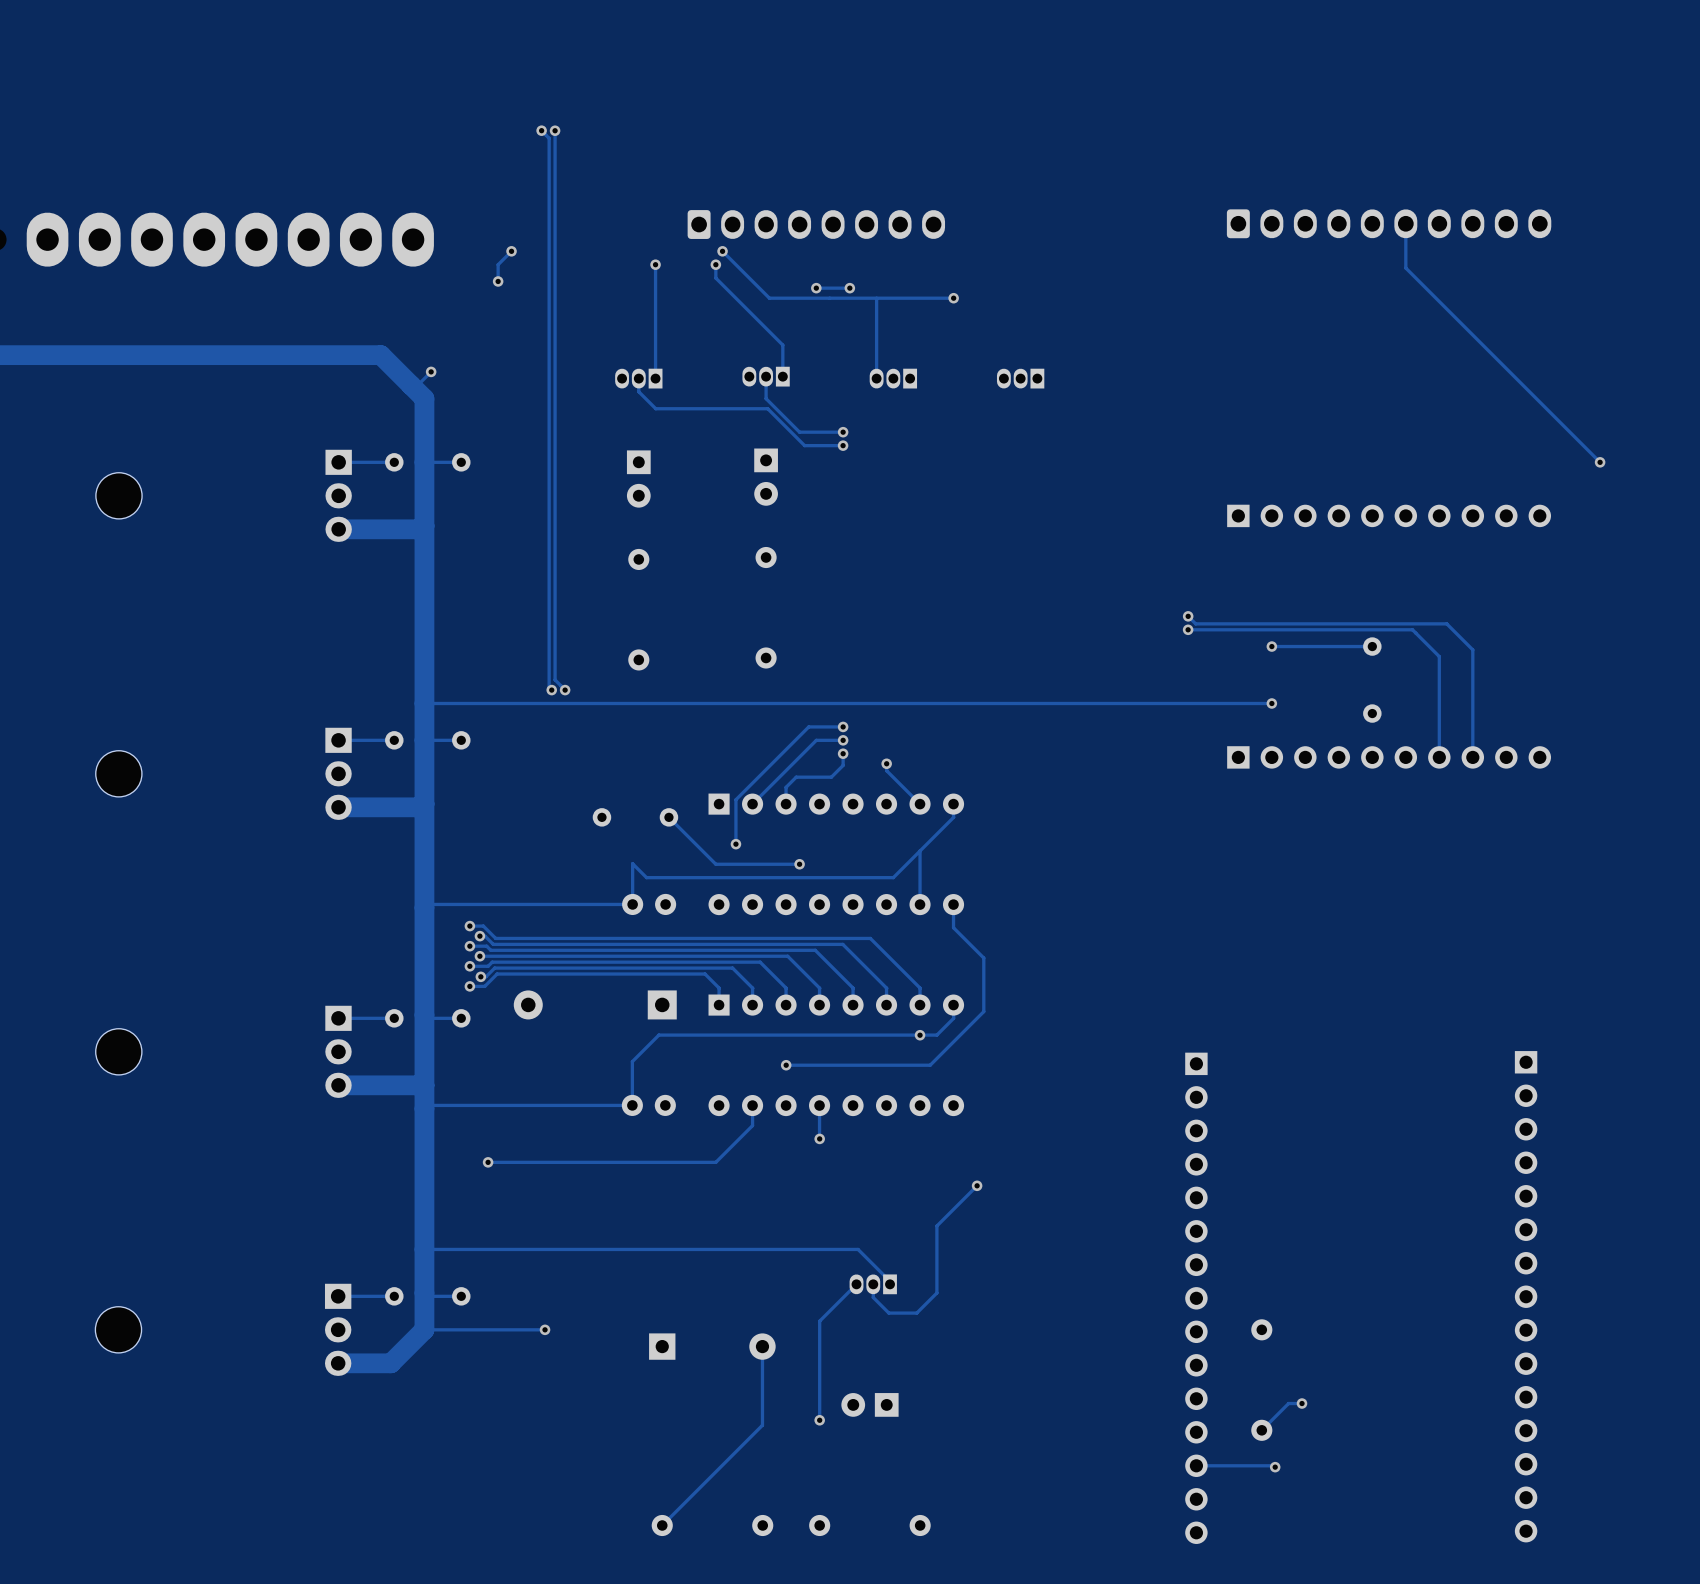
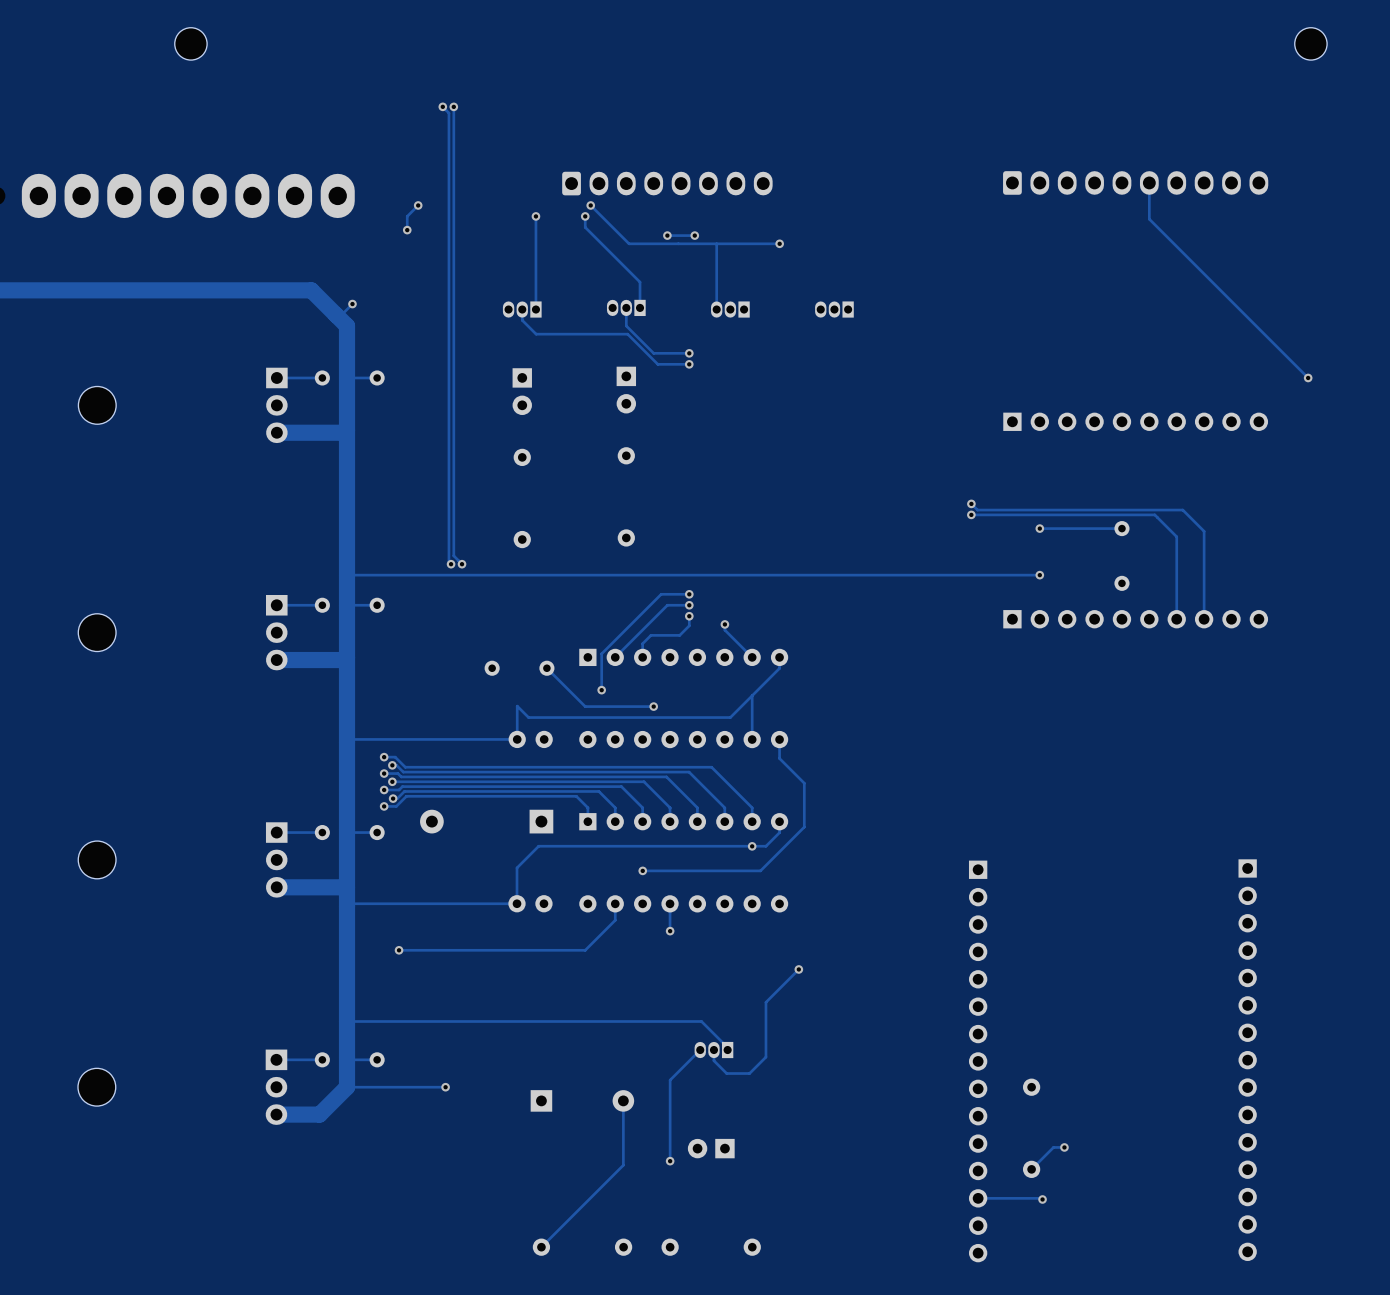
part: none -> (190, 43)
part: none -> (1310, 43)

